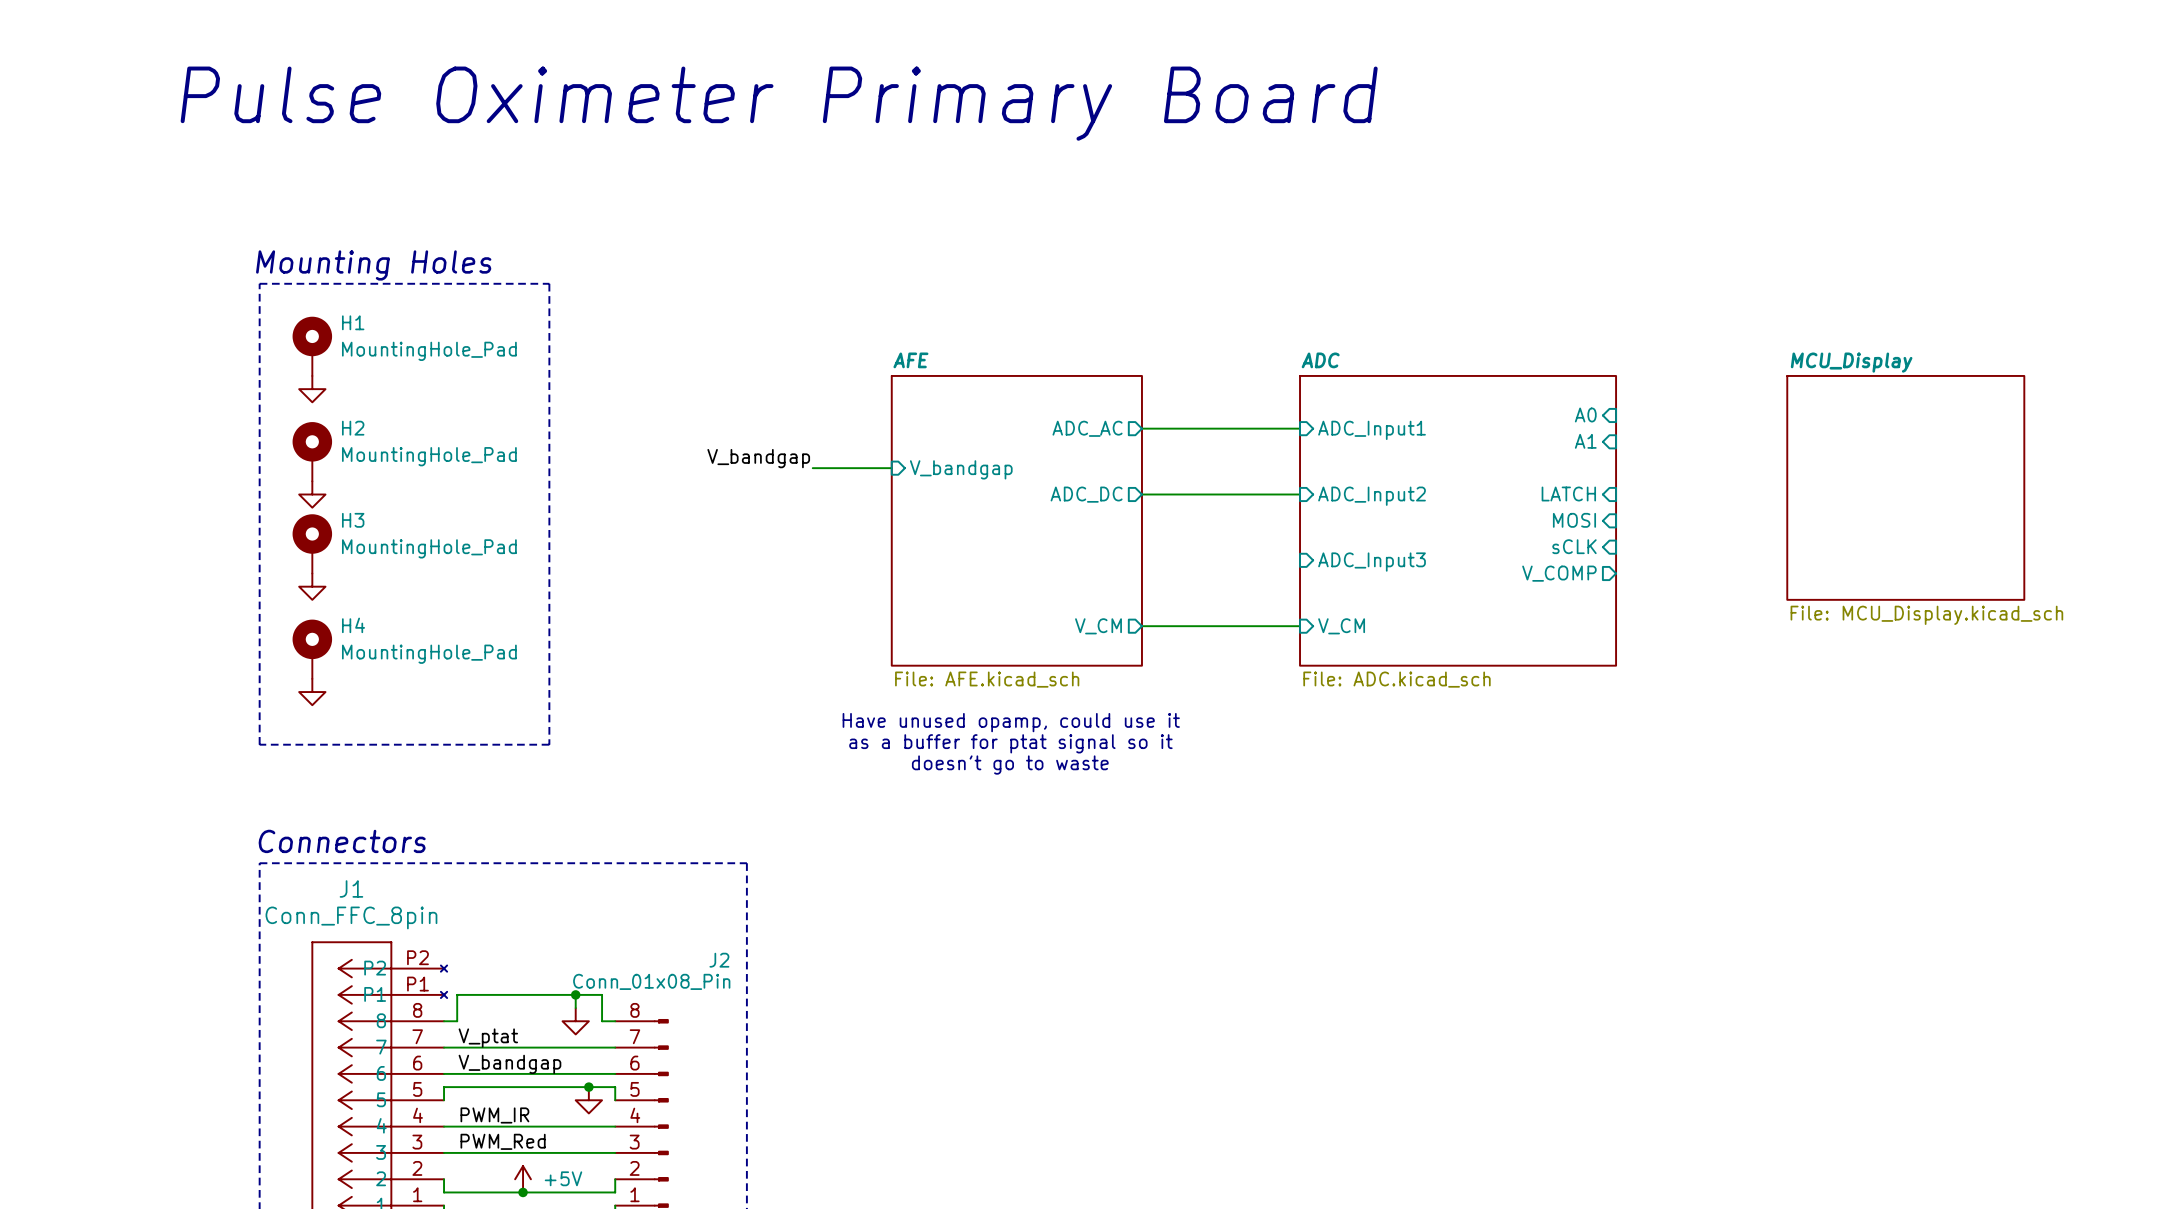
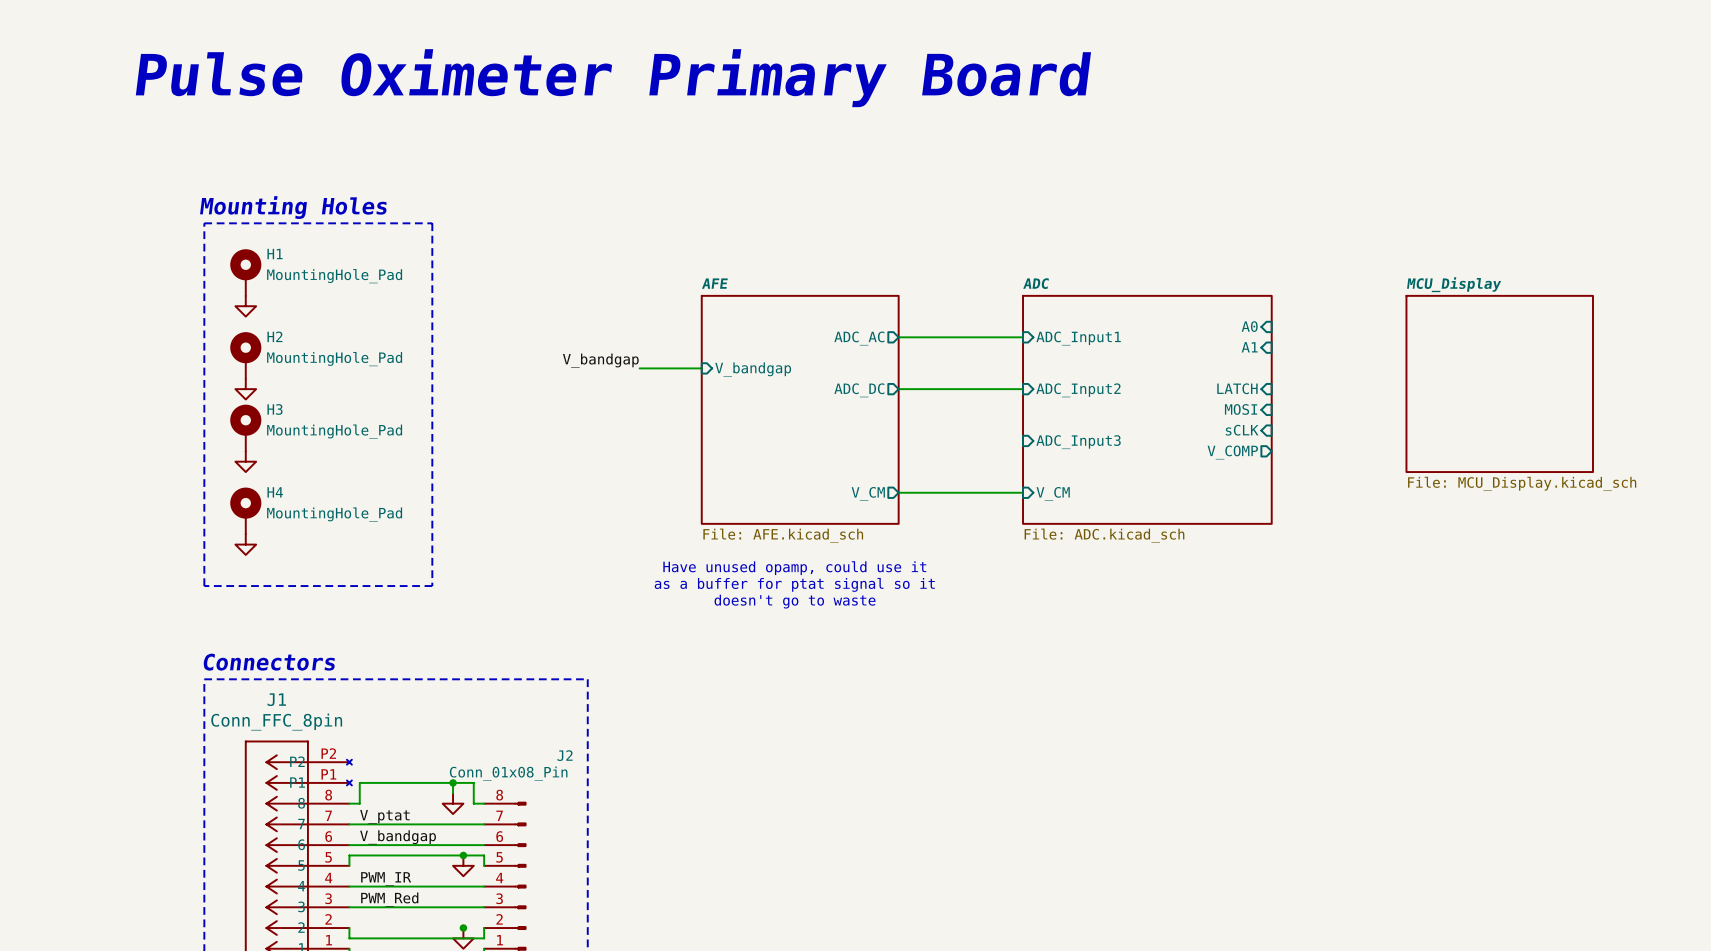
power symbol: +5V (523, 1179) -> none
junction: none -> (463, 928)
junction: (523, 1192) -> none
power symbol: none -> (463, 938)

